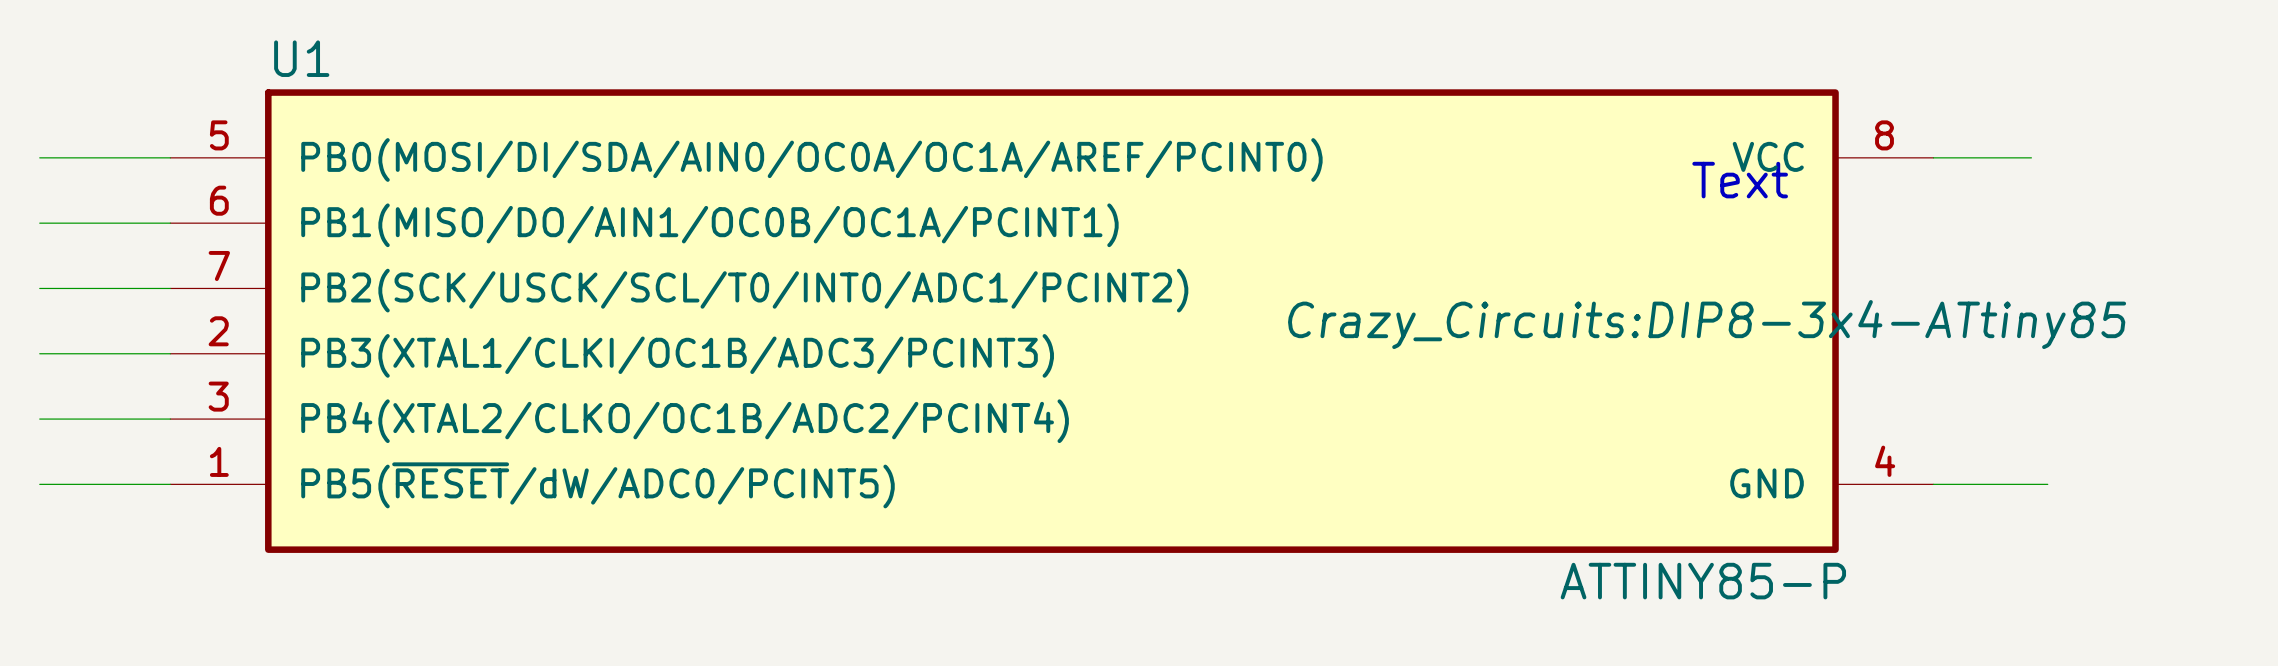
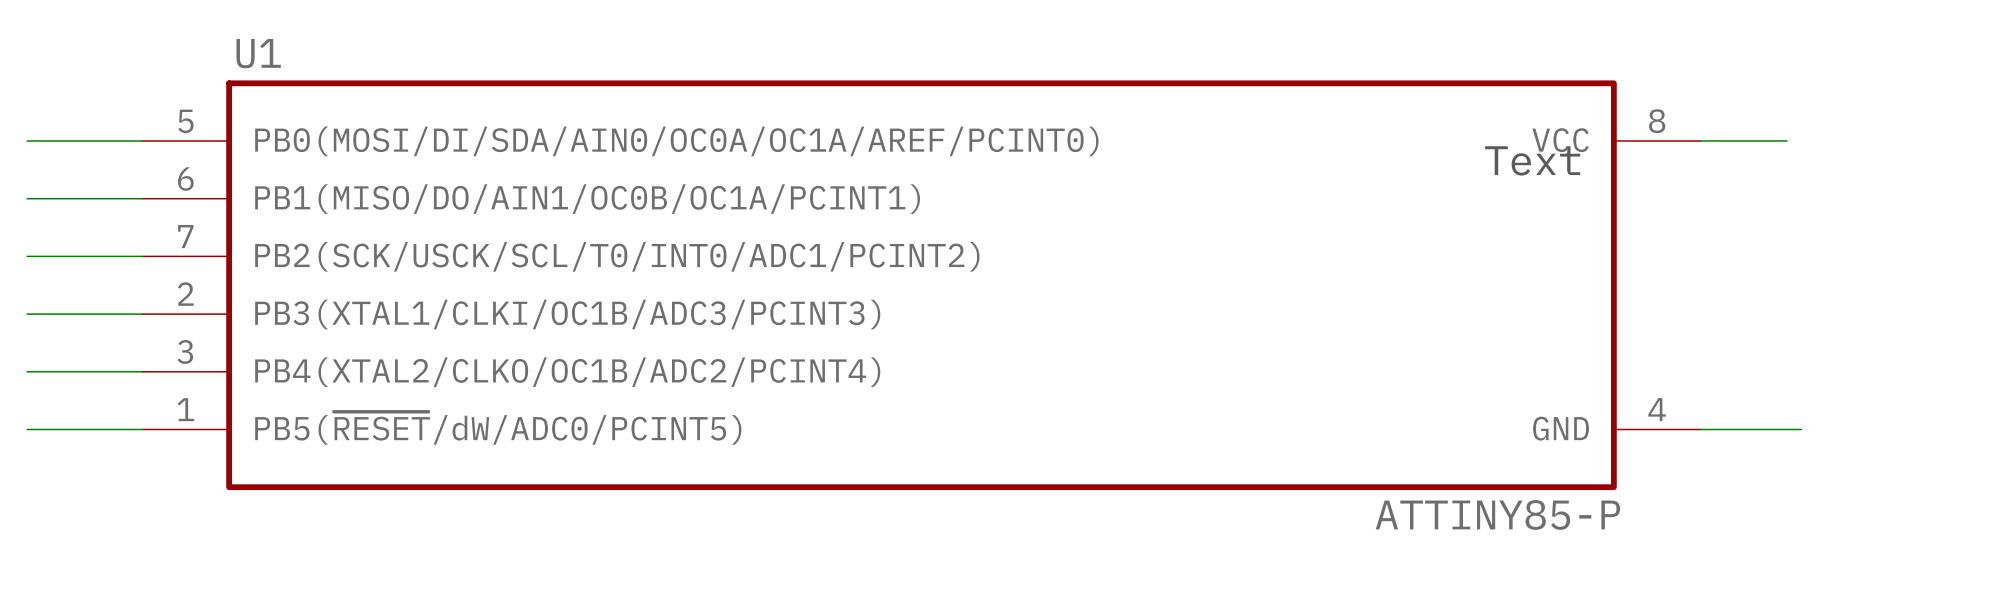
U1 text: Crazy_Circuits:DIP8-3x4-ATtiny85 (1707, 324) -> none

